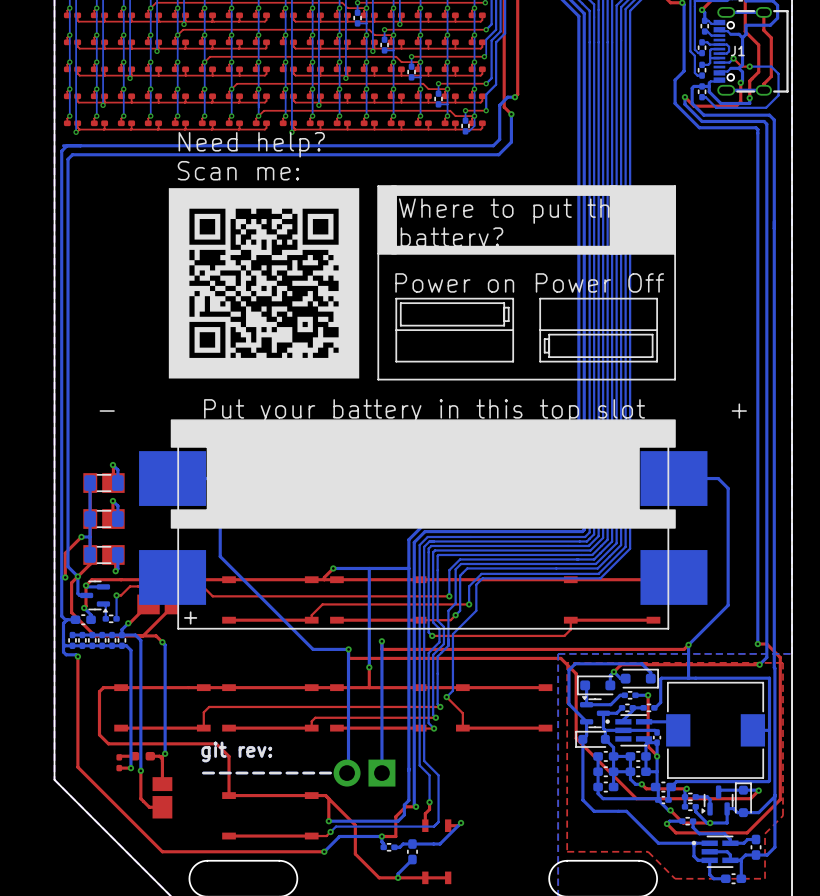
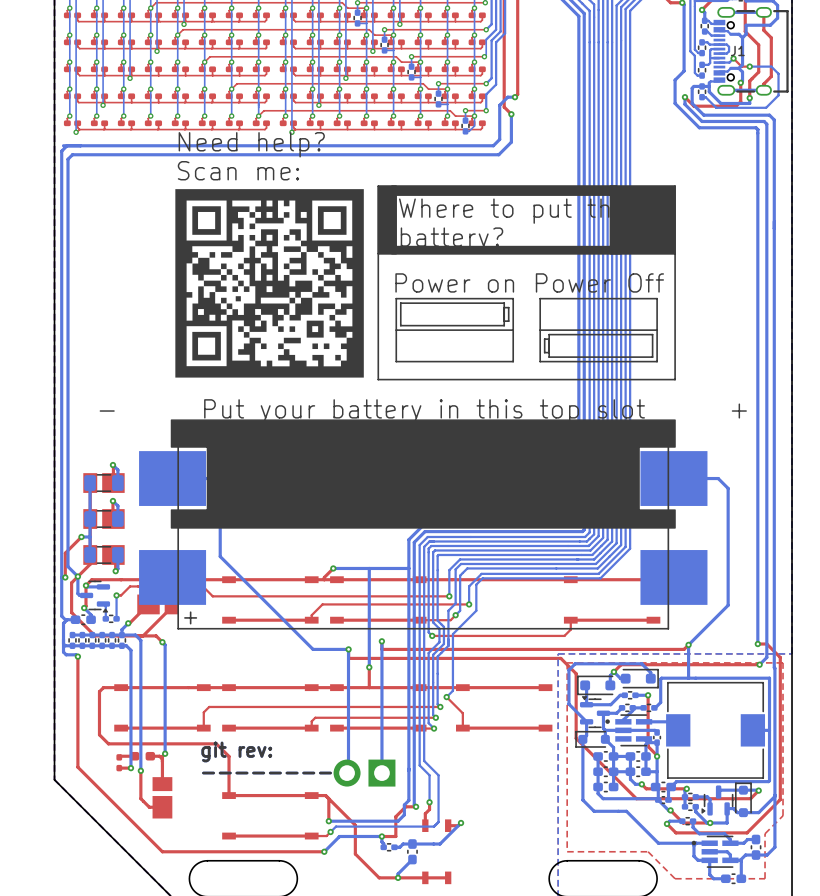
drawing: [168, 188, 360, 379] -> none
drawing: none -> [175, 189, 364, 378]
drawing shape: [194, 213, 221, 240] -> [192, 206, 221, 235]
drawing shape: [225, 291, 236, 297] -> [232, 286, 239, 292]
drawing shape: [194, 327, 221, 353] -> [192, 331, 221, 361]

